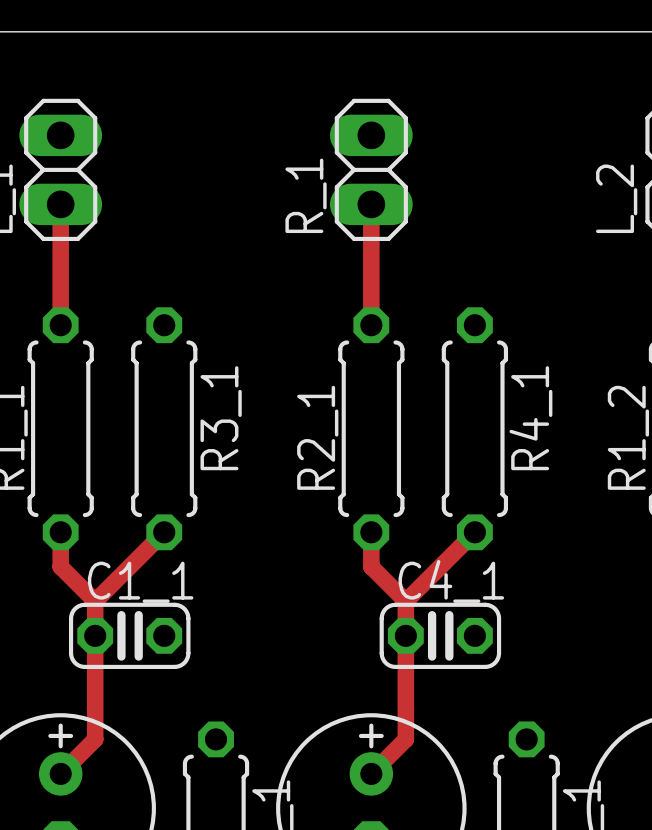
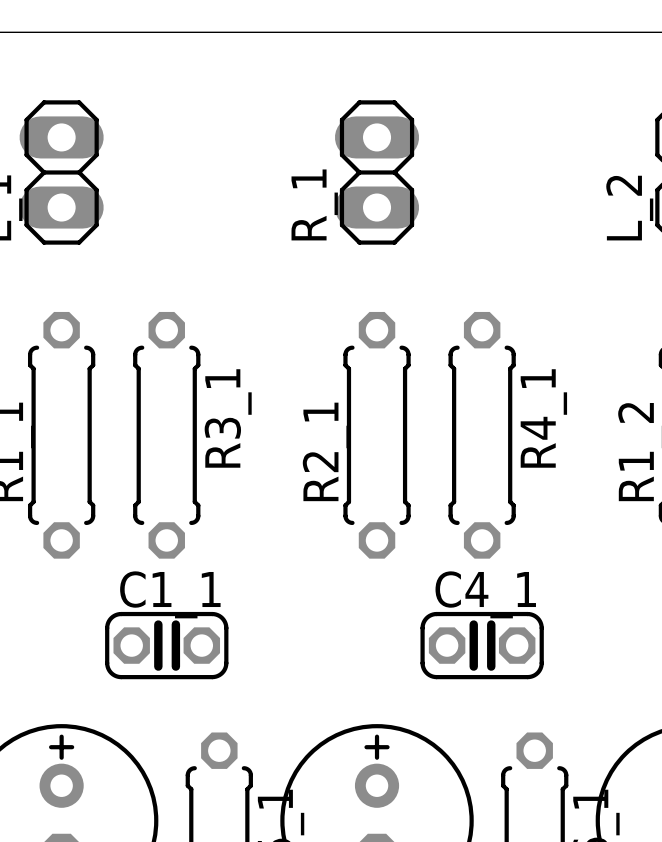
track: (60, 204) (60, 325) -> none
track: (371, 204) (371, 325) -> none
track: (60, 532) (60, 566) (95, 601) -> none
track: (164, 532) (95, 601) -> none
track: (371, 532) (371, 566) (405, 601) -> none
track: (474, 532) (405, 601) -> none
track: (95, 601) (95, 739) (60, 773) -> none
track: (405, 601) (405, 739) (371, 773) -> none
C1_1 position: (129, 635) -> (166, 645)
C4_1 position: (440, 635) -> (482, 645)

